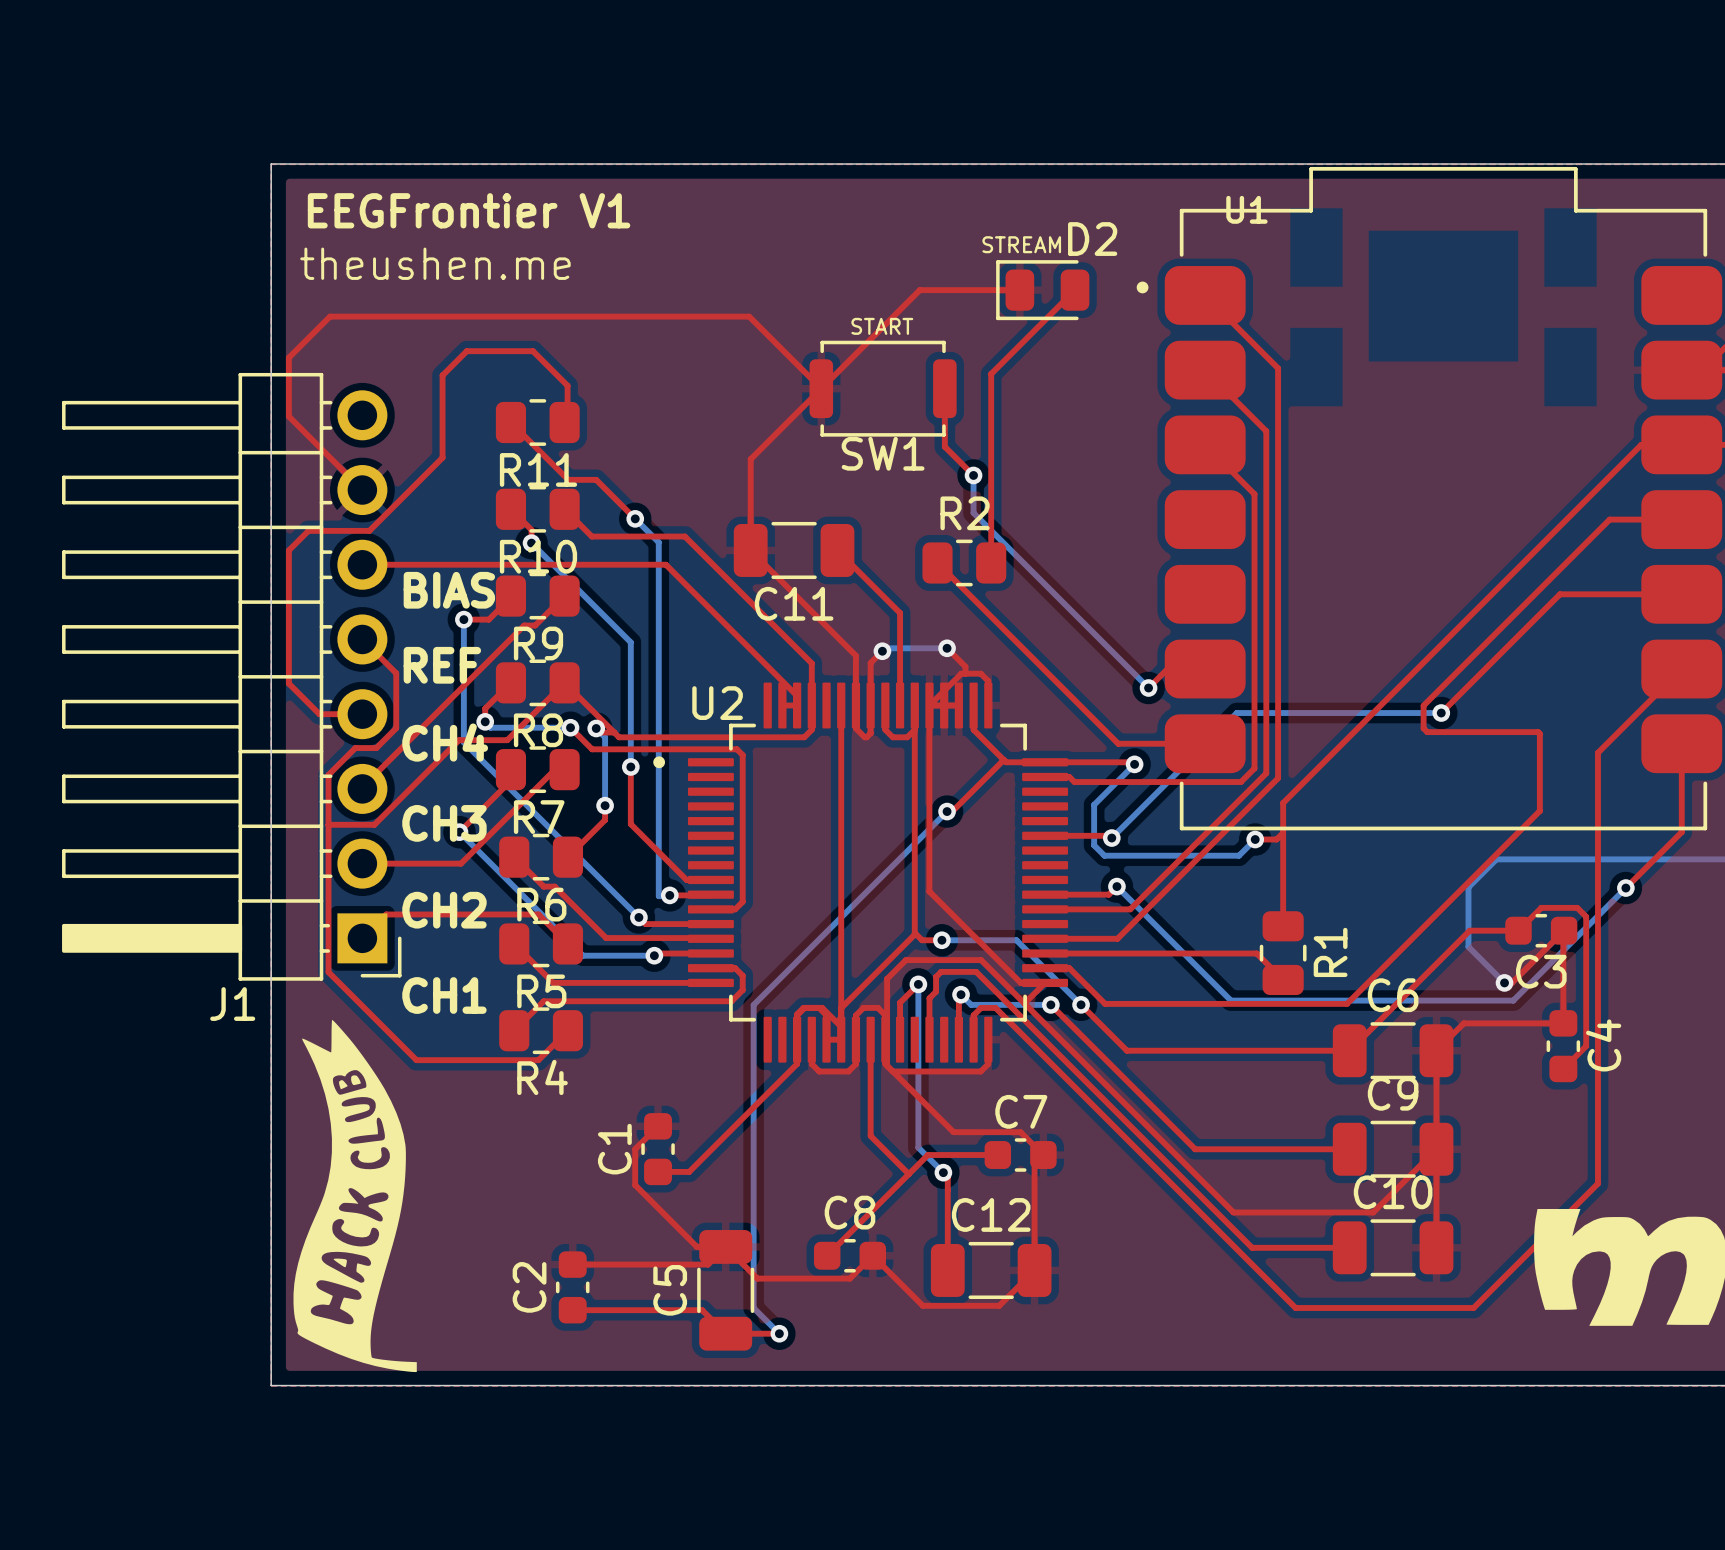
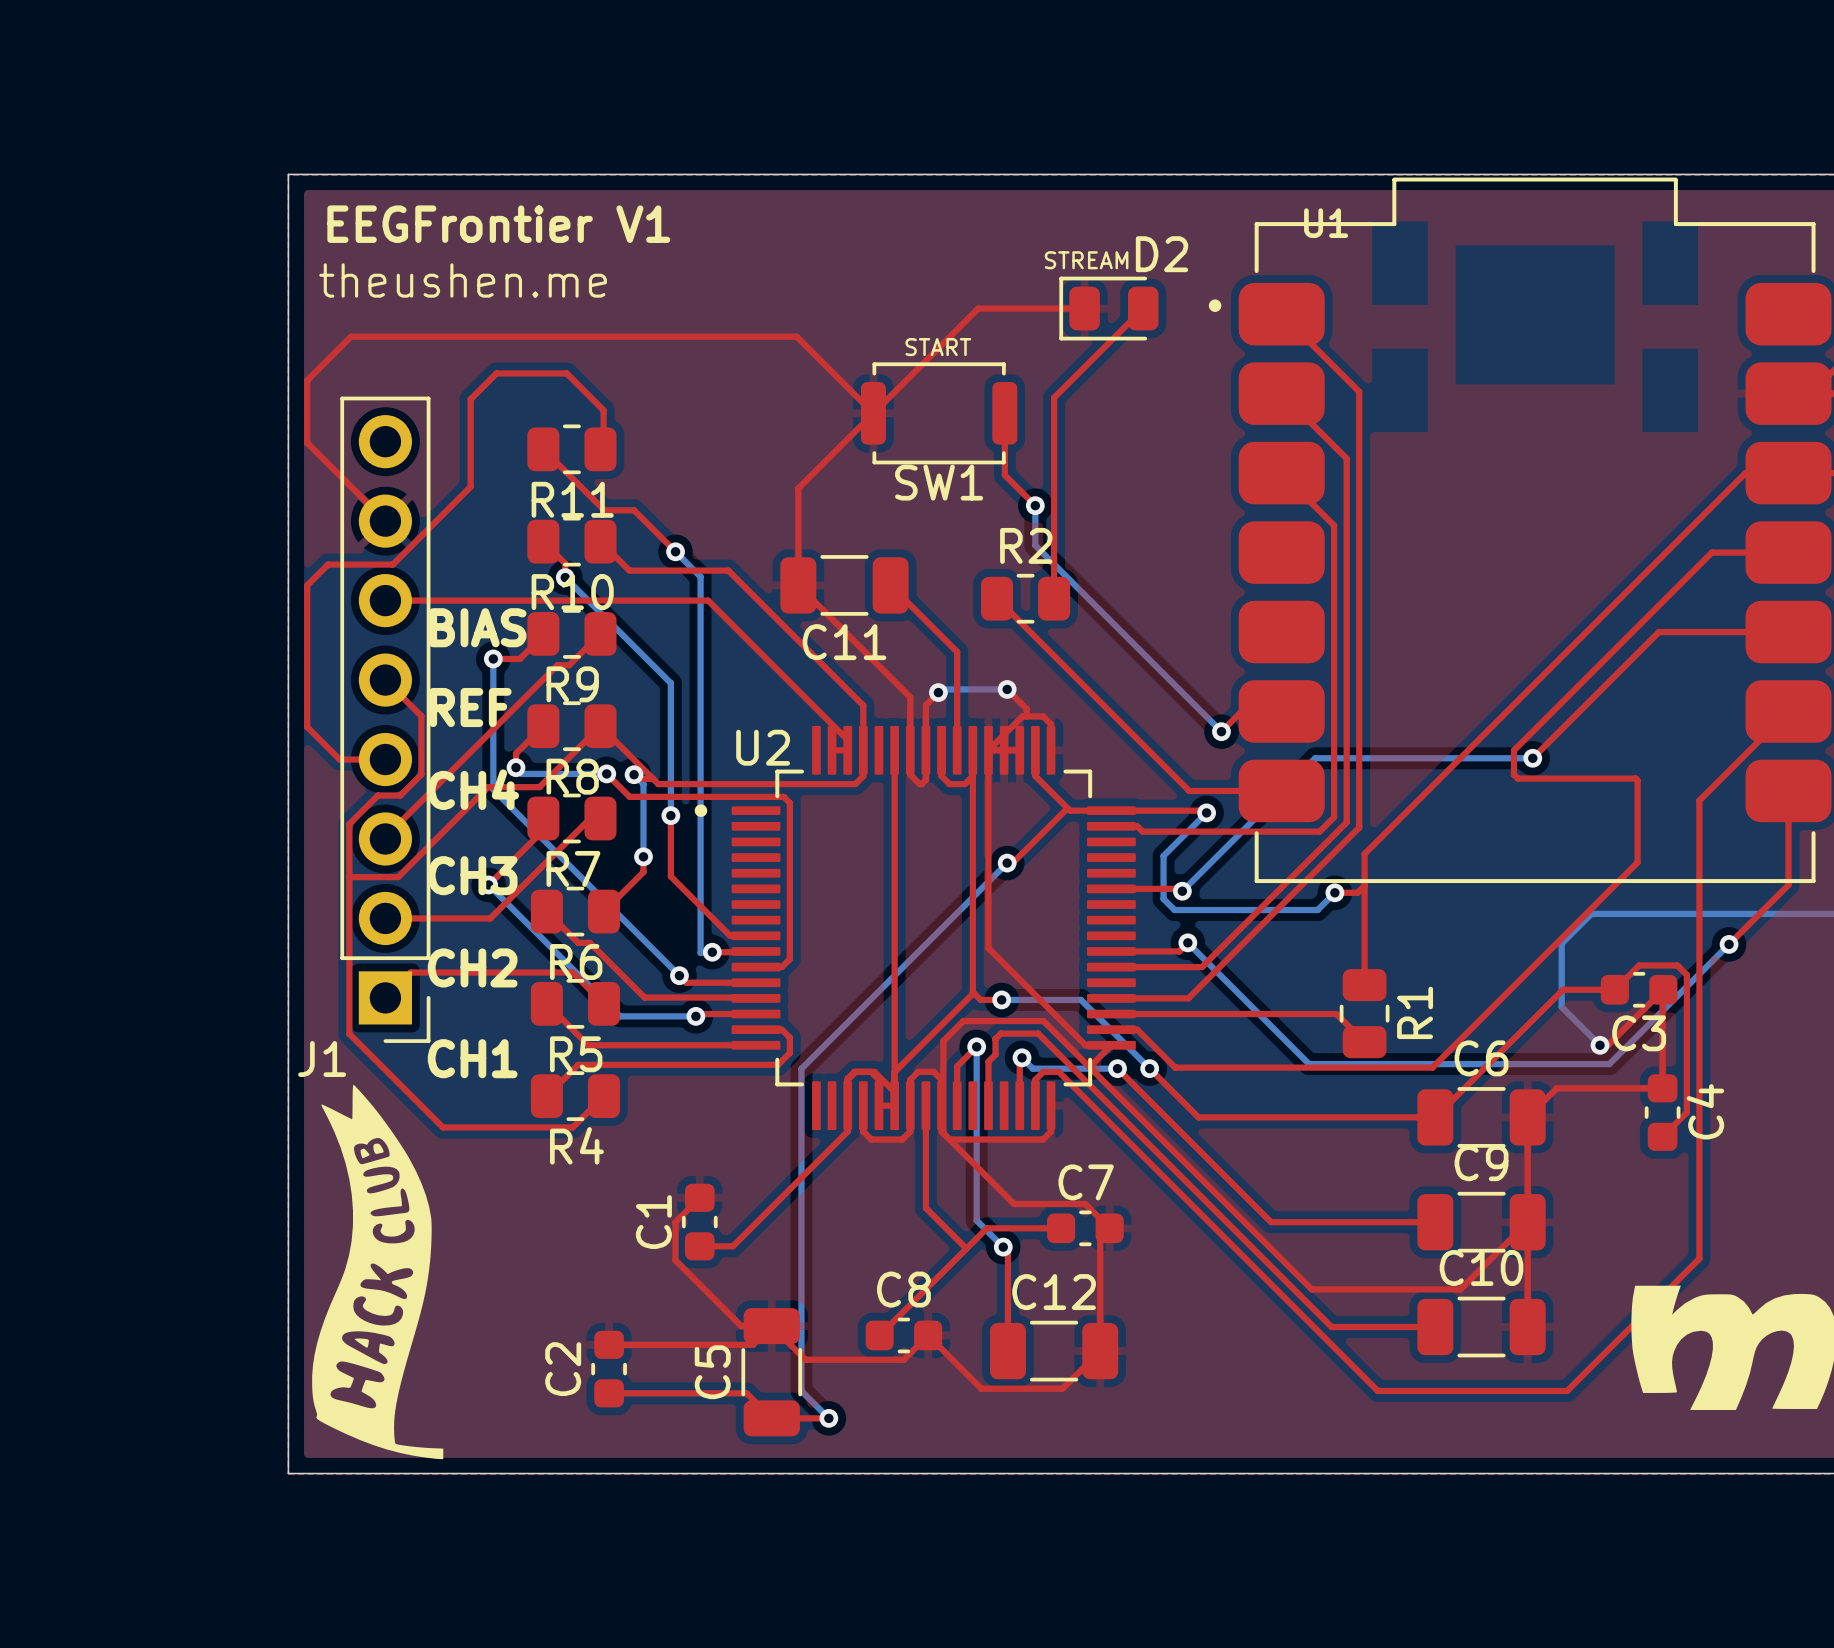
J1 footprint: [62, 372, 402, 981] -> [340, 396, 431, 1043]
J1 name position: J1 (232, 1004) -> J1 (322, 1058)

